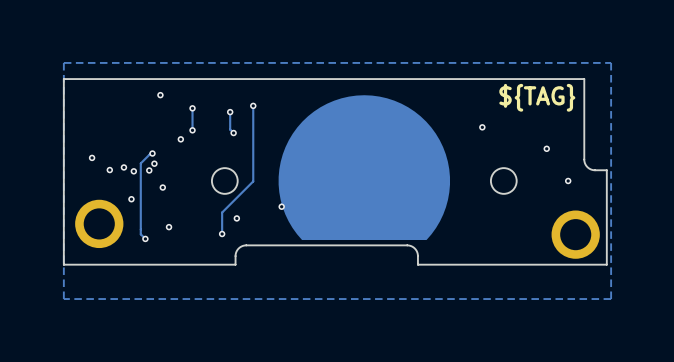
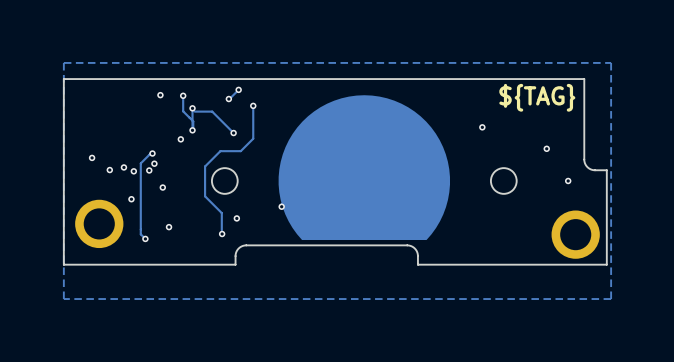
track: none -> (238, 89) (228, 99)
via: none -> (238, 89)
track: none -> (183, 95) (183, 111) (193, 121) (193, 131)
via: none -> (183, 95)
via: none -> (228, 99)
track: (230, 112) (230, 129) -> (194, 111) (212, 111) (230, 129)
via: (230, 112) -> none
track: (253, 138) (253, 181) (222, 212) (222, 233) -> (253, 138) (240, 151) (220, 151) (205, 166) (205, 196) (221, 213) (221, 230)

